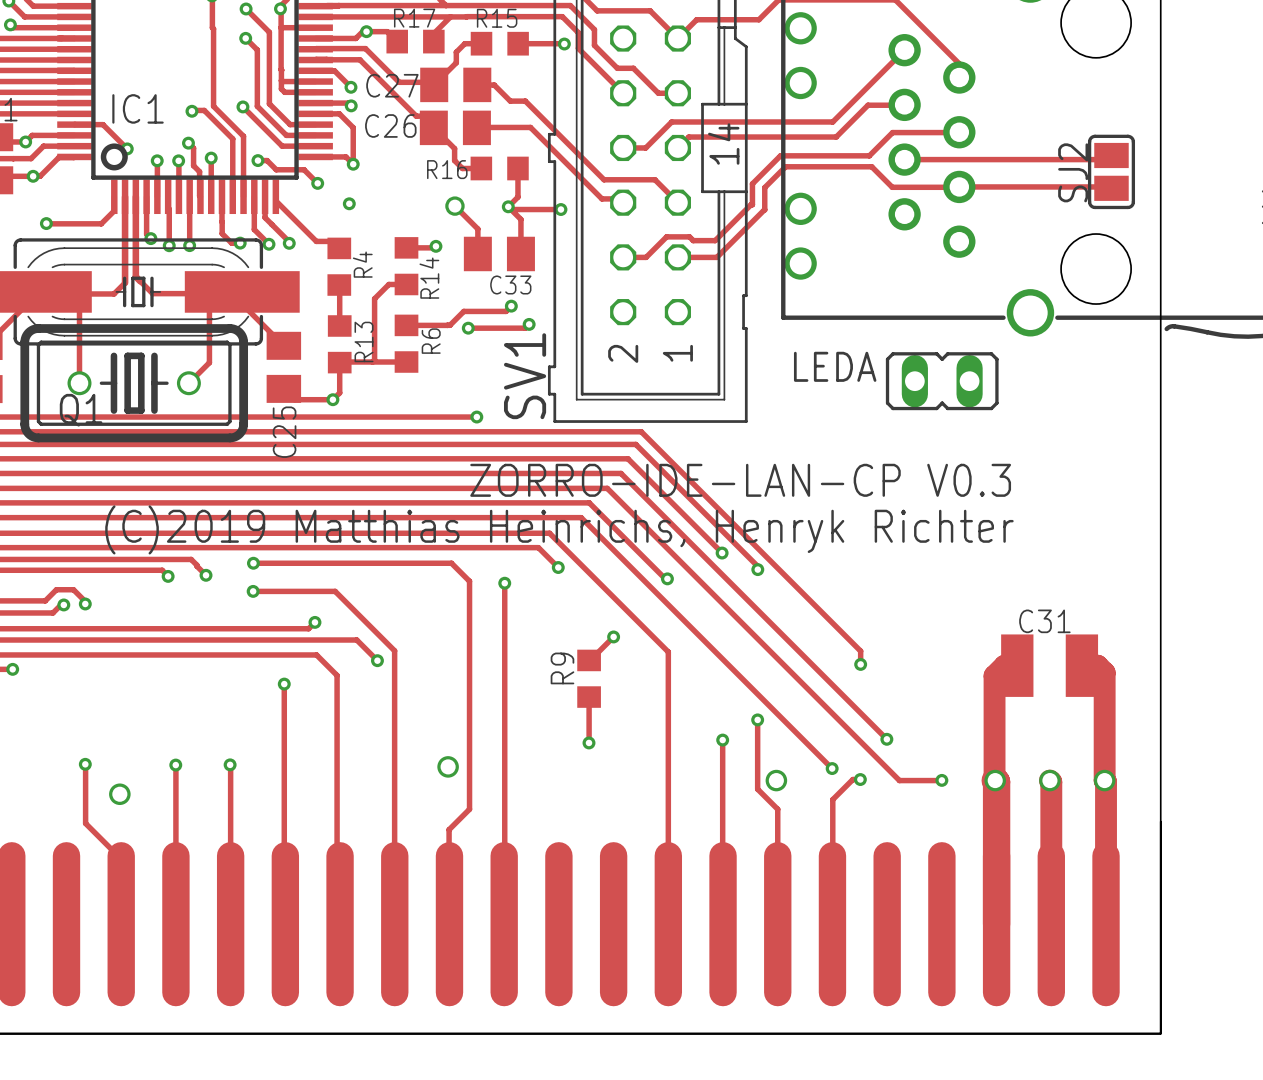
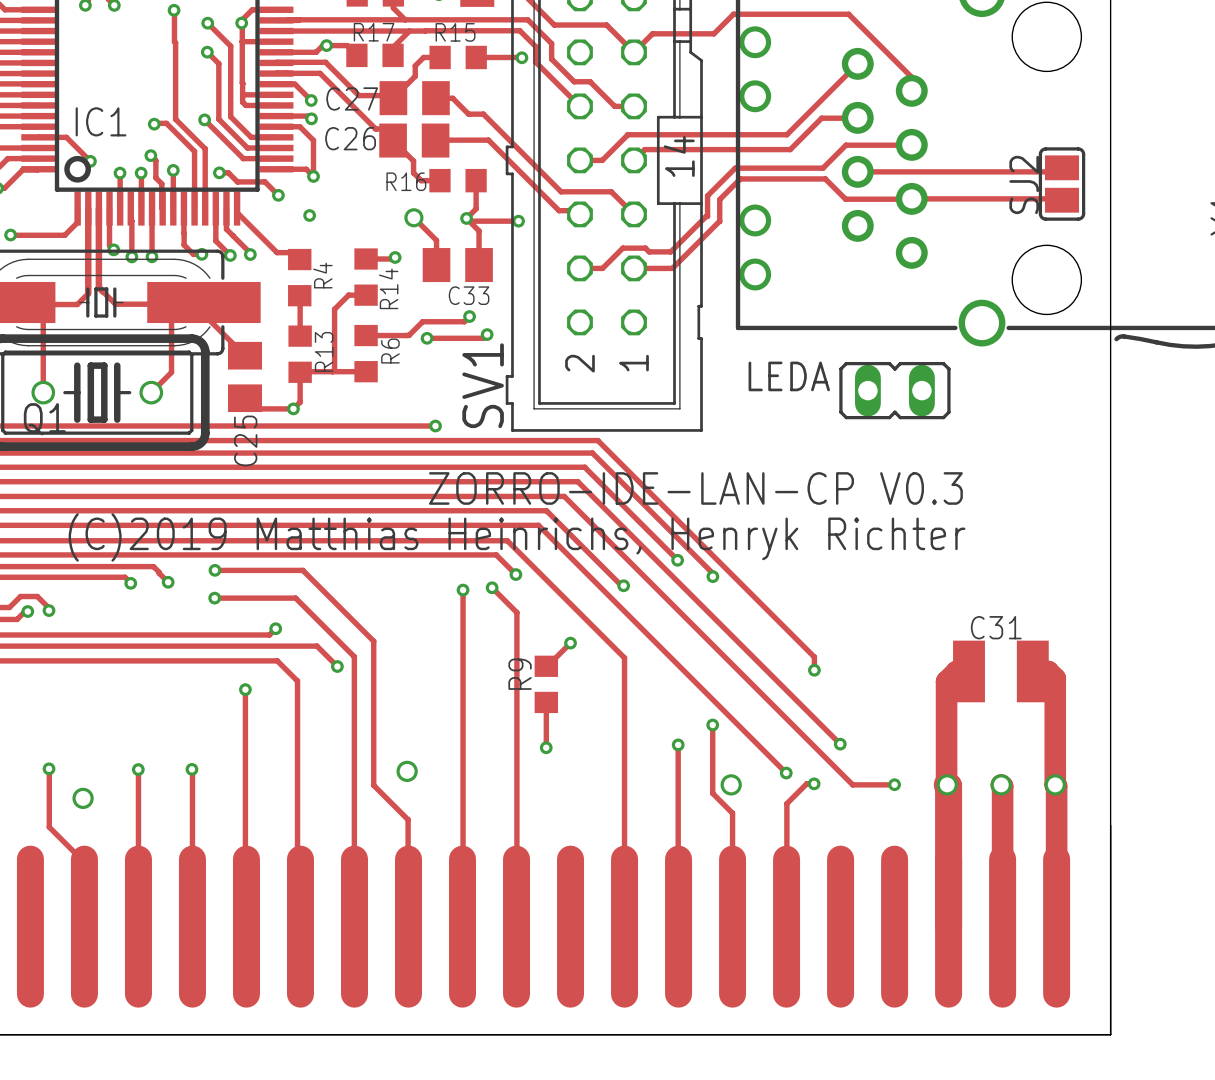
track: (253, 563) (451, 563) (469, 581) (469, 809) (449, 829) -> (215, 570) (302, 570) (373, 641) (373, 785) (408, 819) (408, 833)
track: none -> (492, 587) (516, 612) (516, 926)
via: none -> (492, 587)

